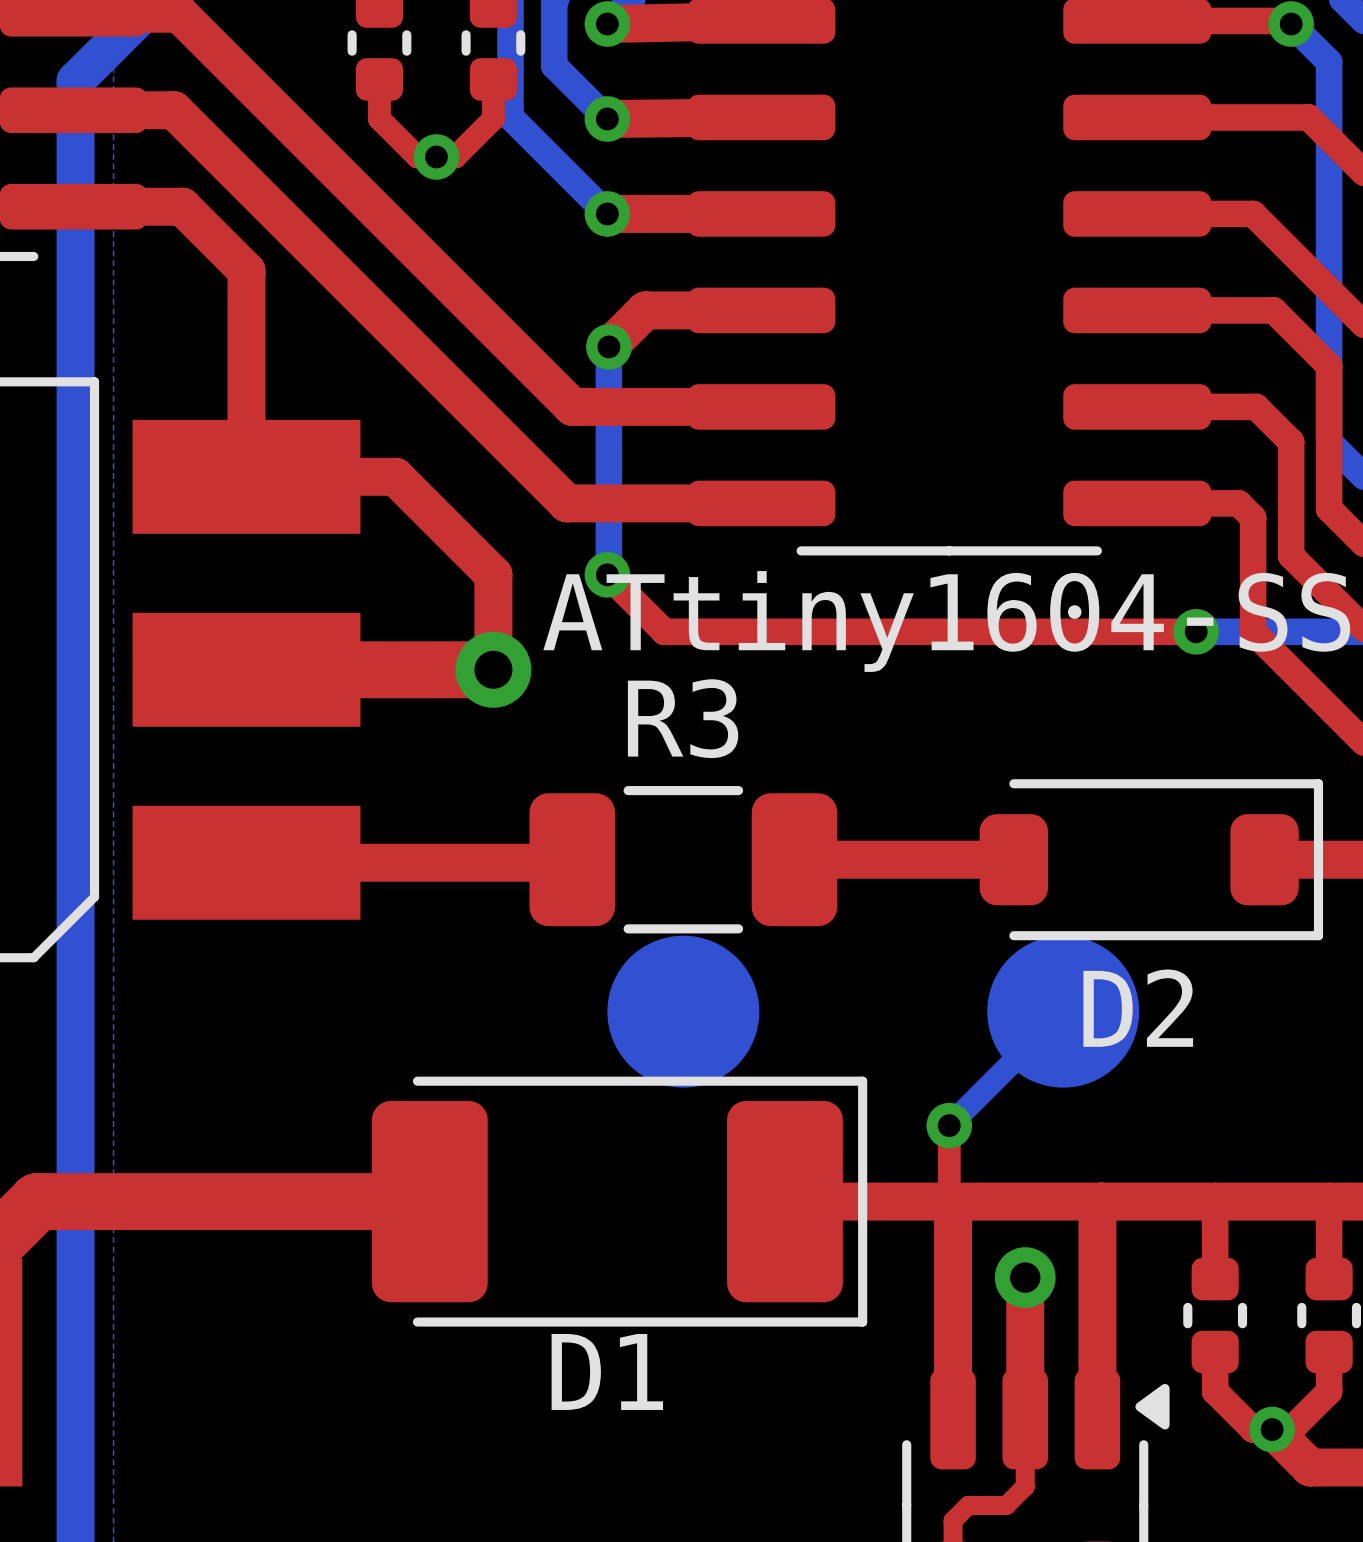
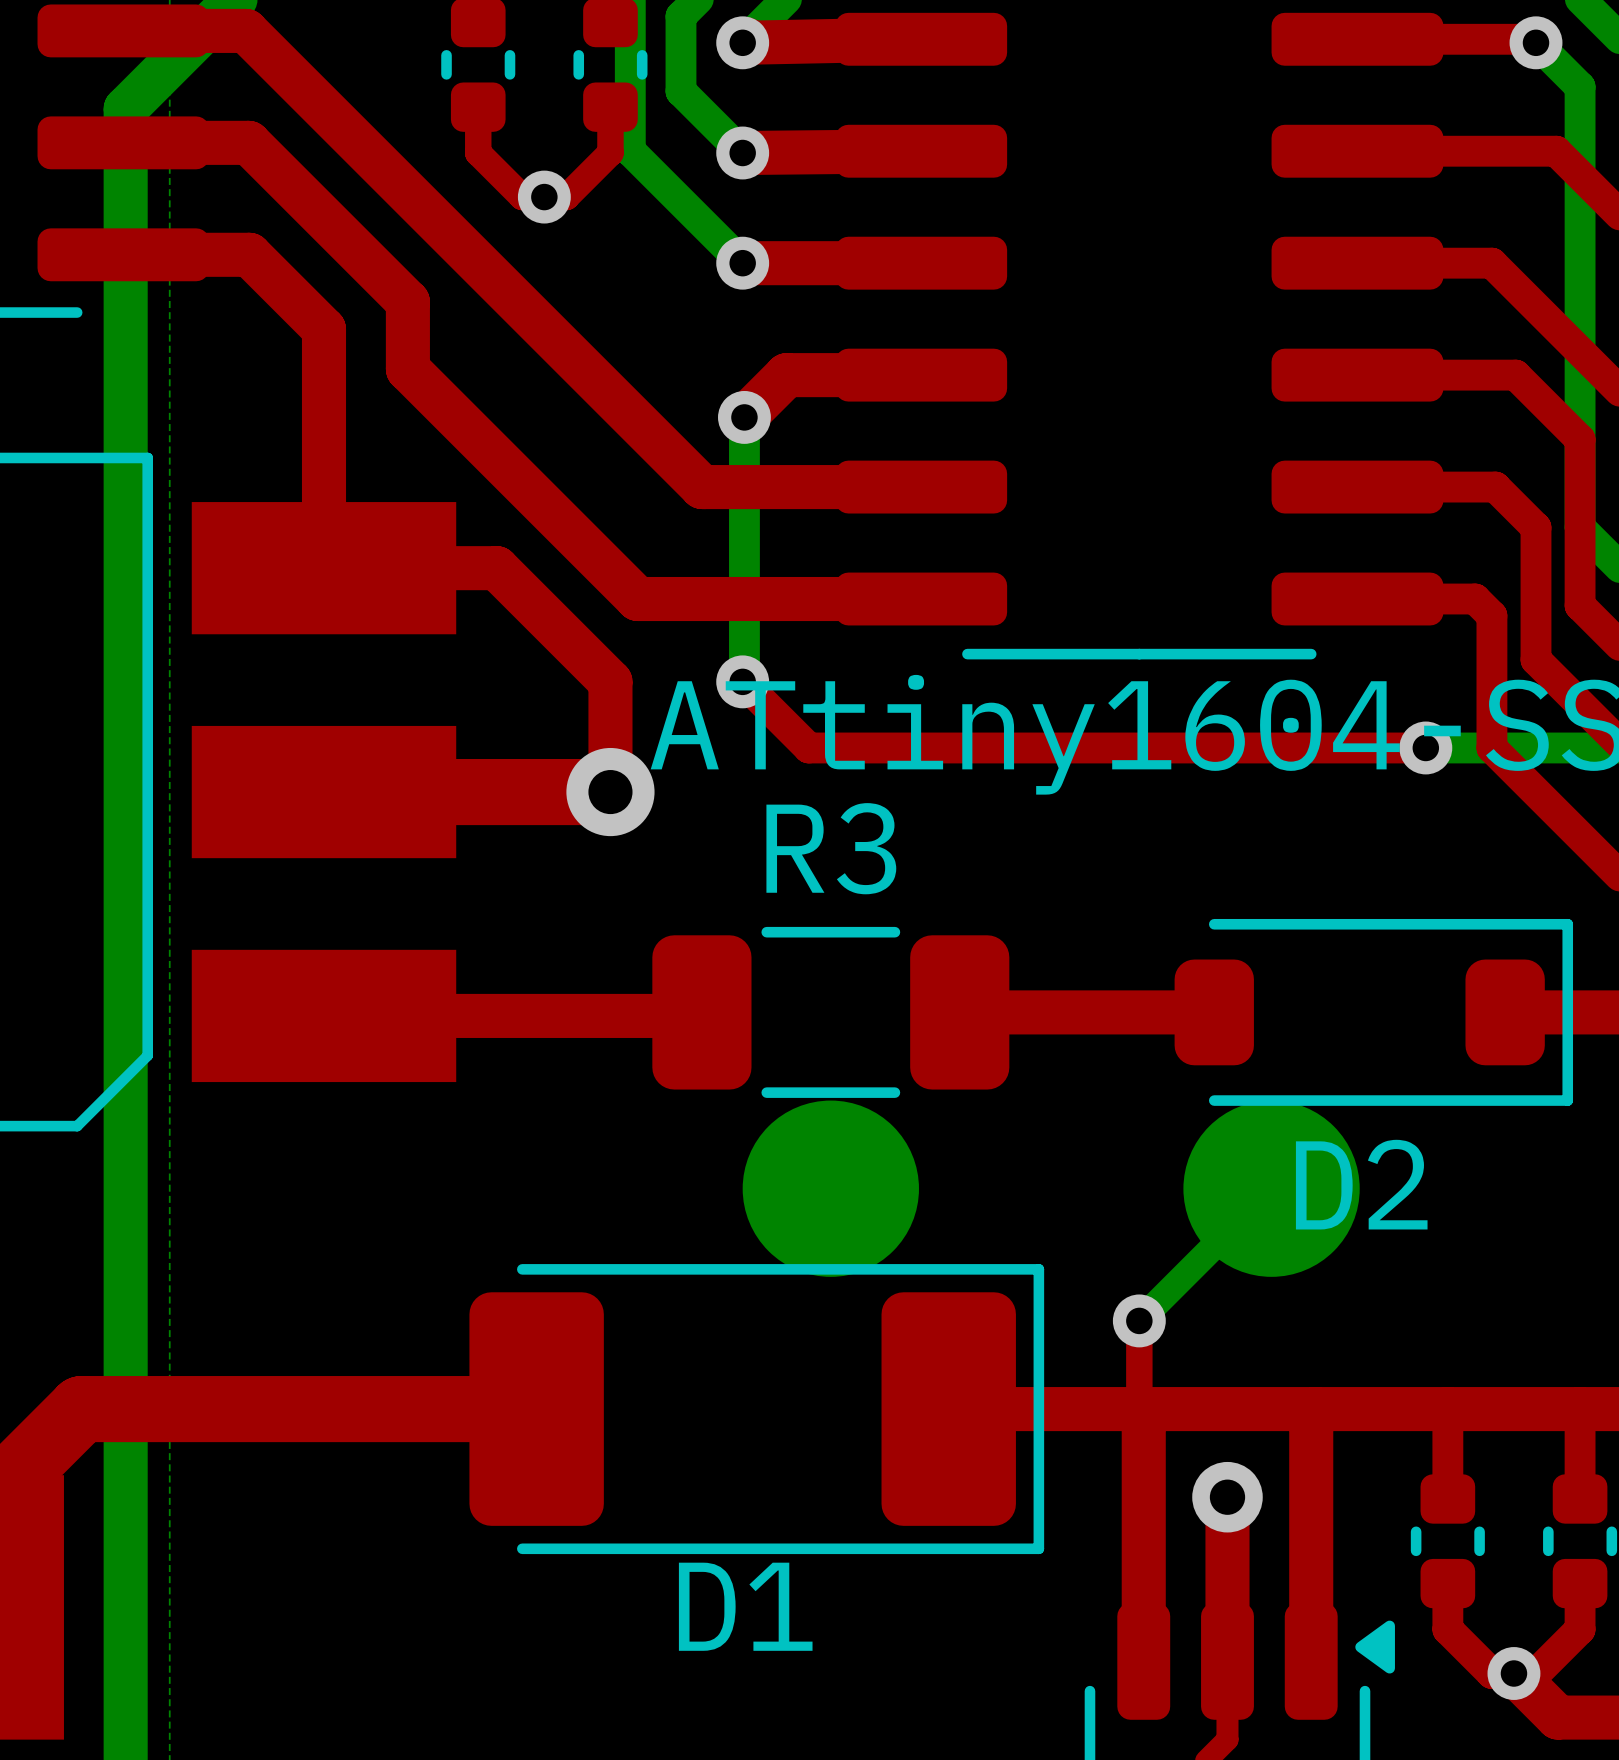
top track: (173, 110) (567, 503) -> (239, 142) (248, 142) (407, 301) (407, 369) (637, 599) (695, 599)

